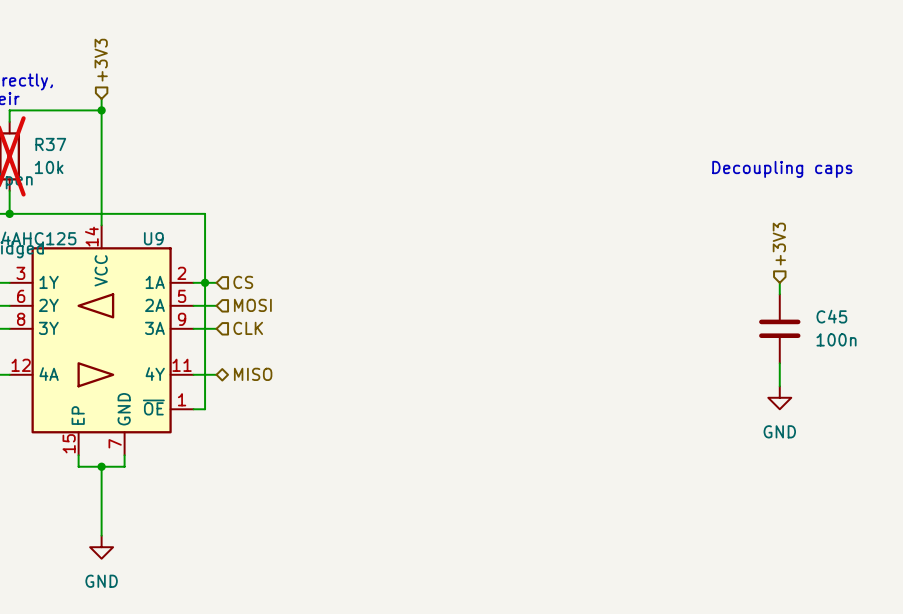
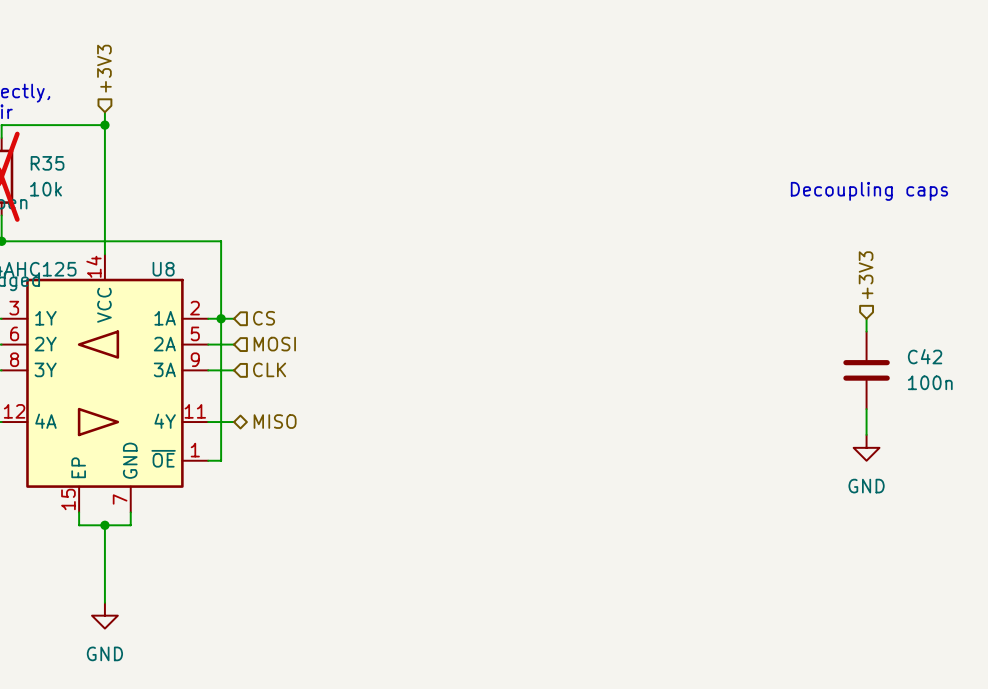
R37 name: R37 (50, 144) -> R35 (47, 163)
U9 name: U9 (153, 238) -> U8 (163, 269)
C45 name: C45 (831, 316) -> C42 (925, 356)

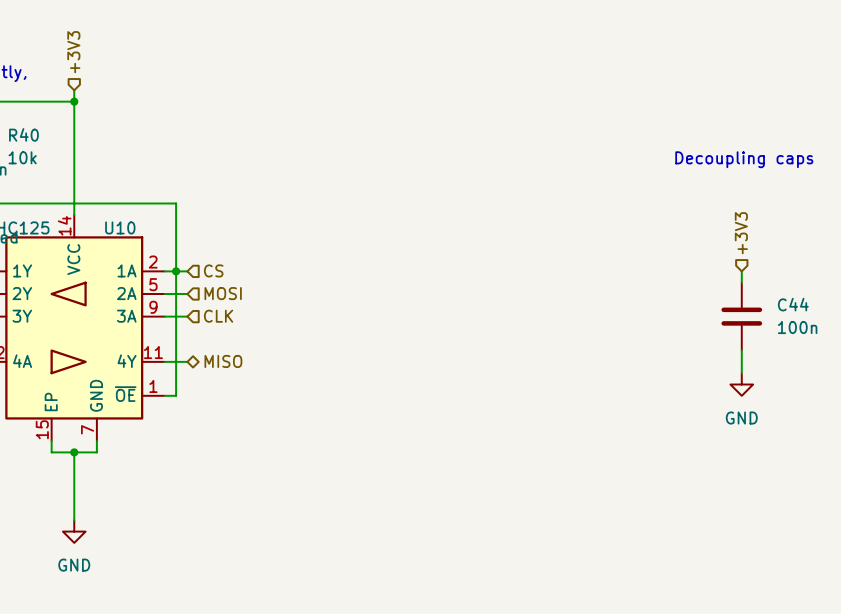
R35 name: R35 (47, 163) -> R40 (23, 134)
U8 name: U8 (163, 269) -> U10 (120, 227)
C42 name: C42 (925, 356) -> C44 (793, 304)

